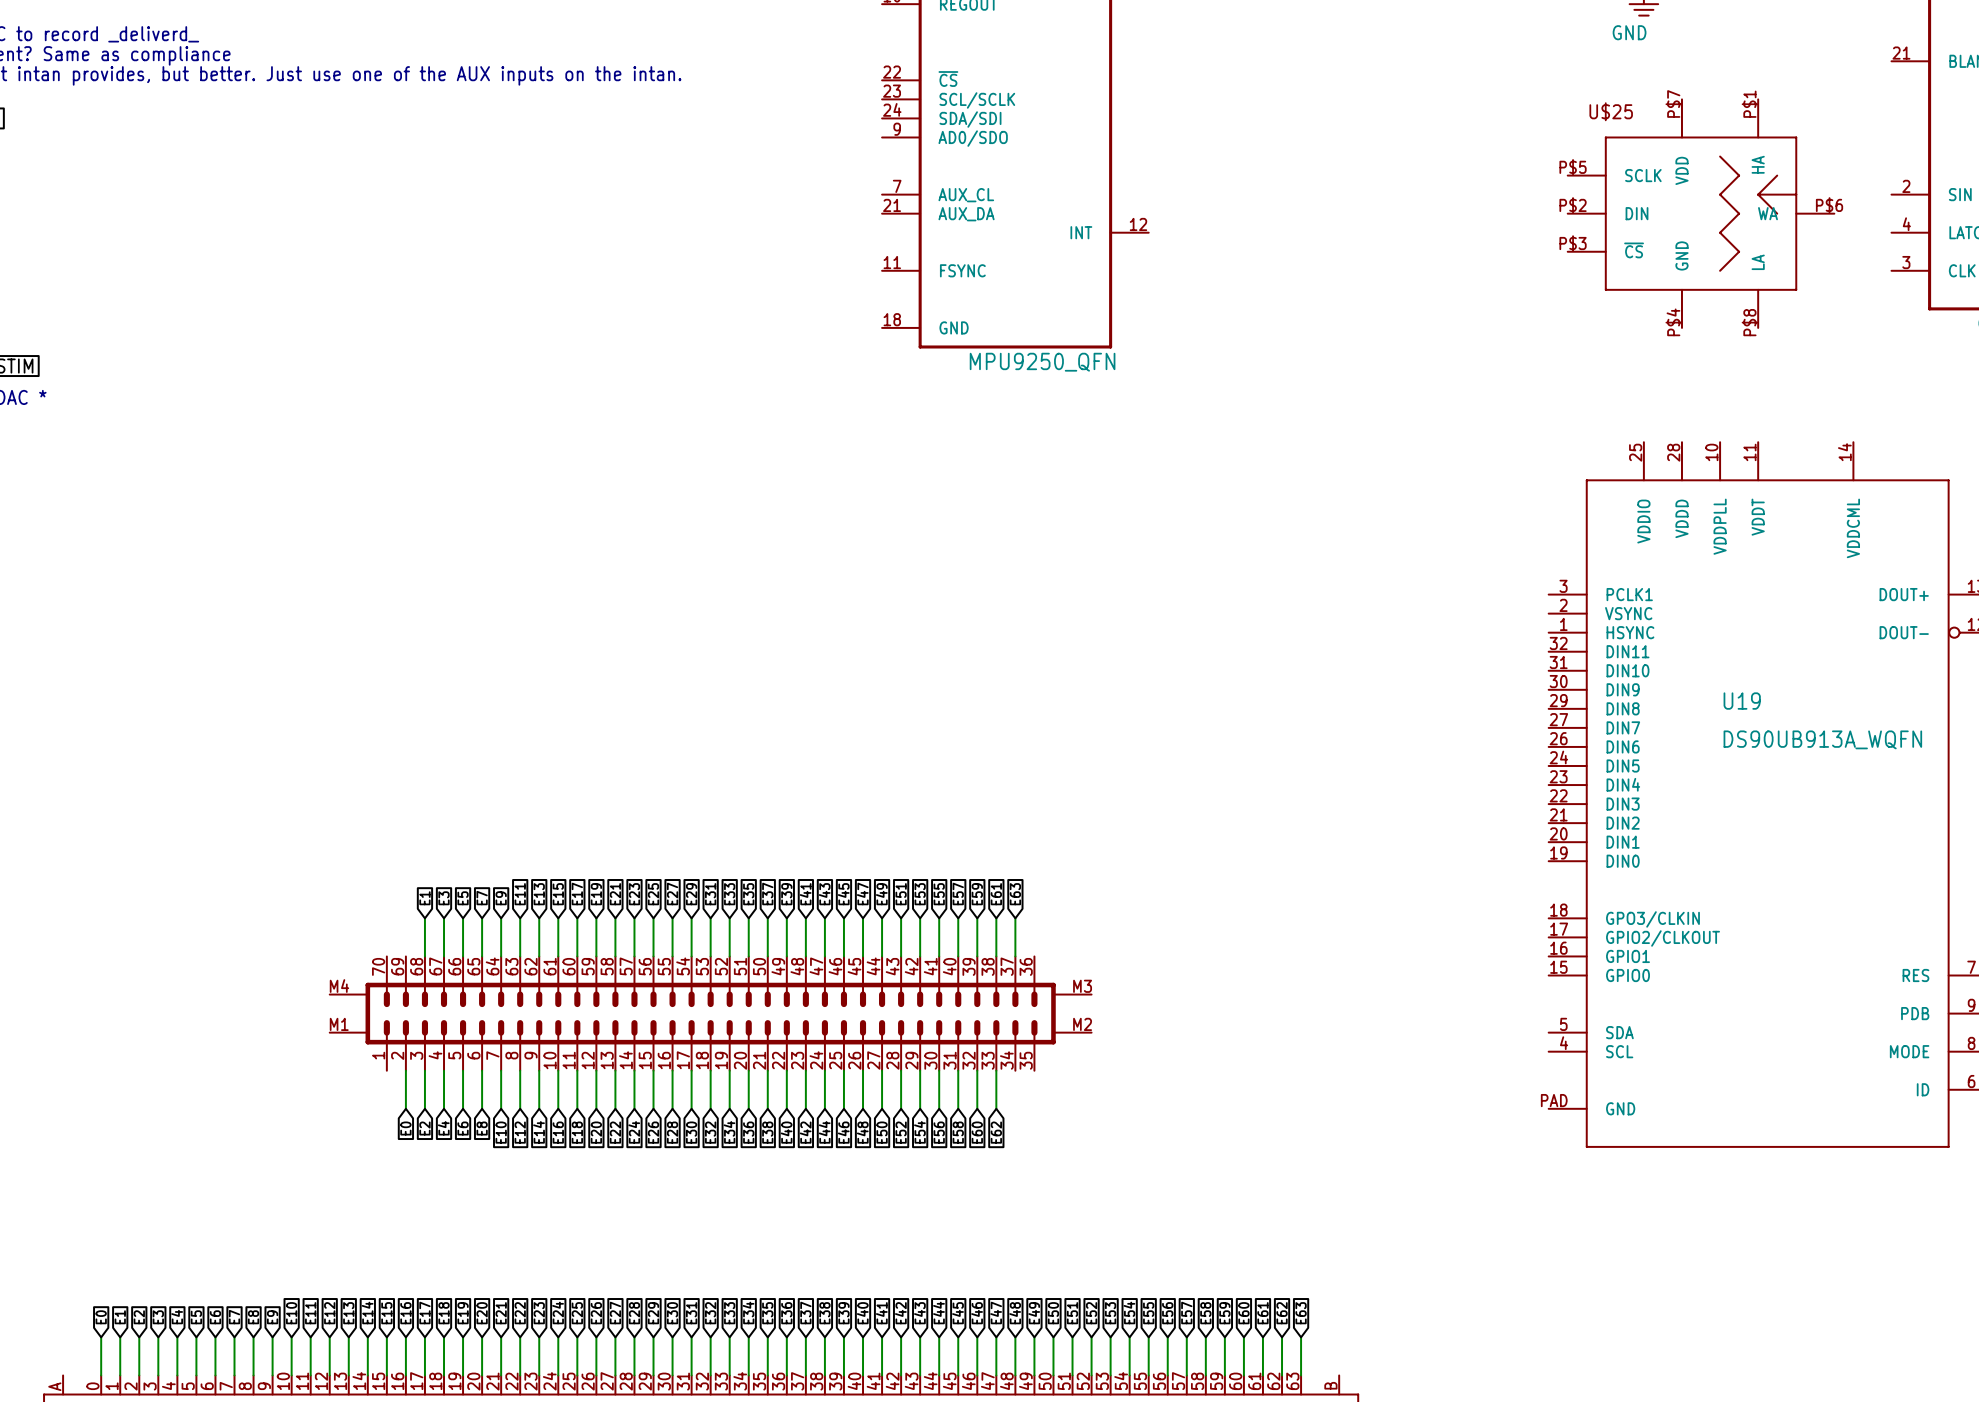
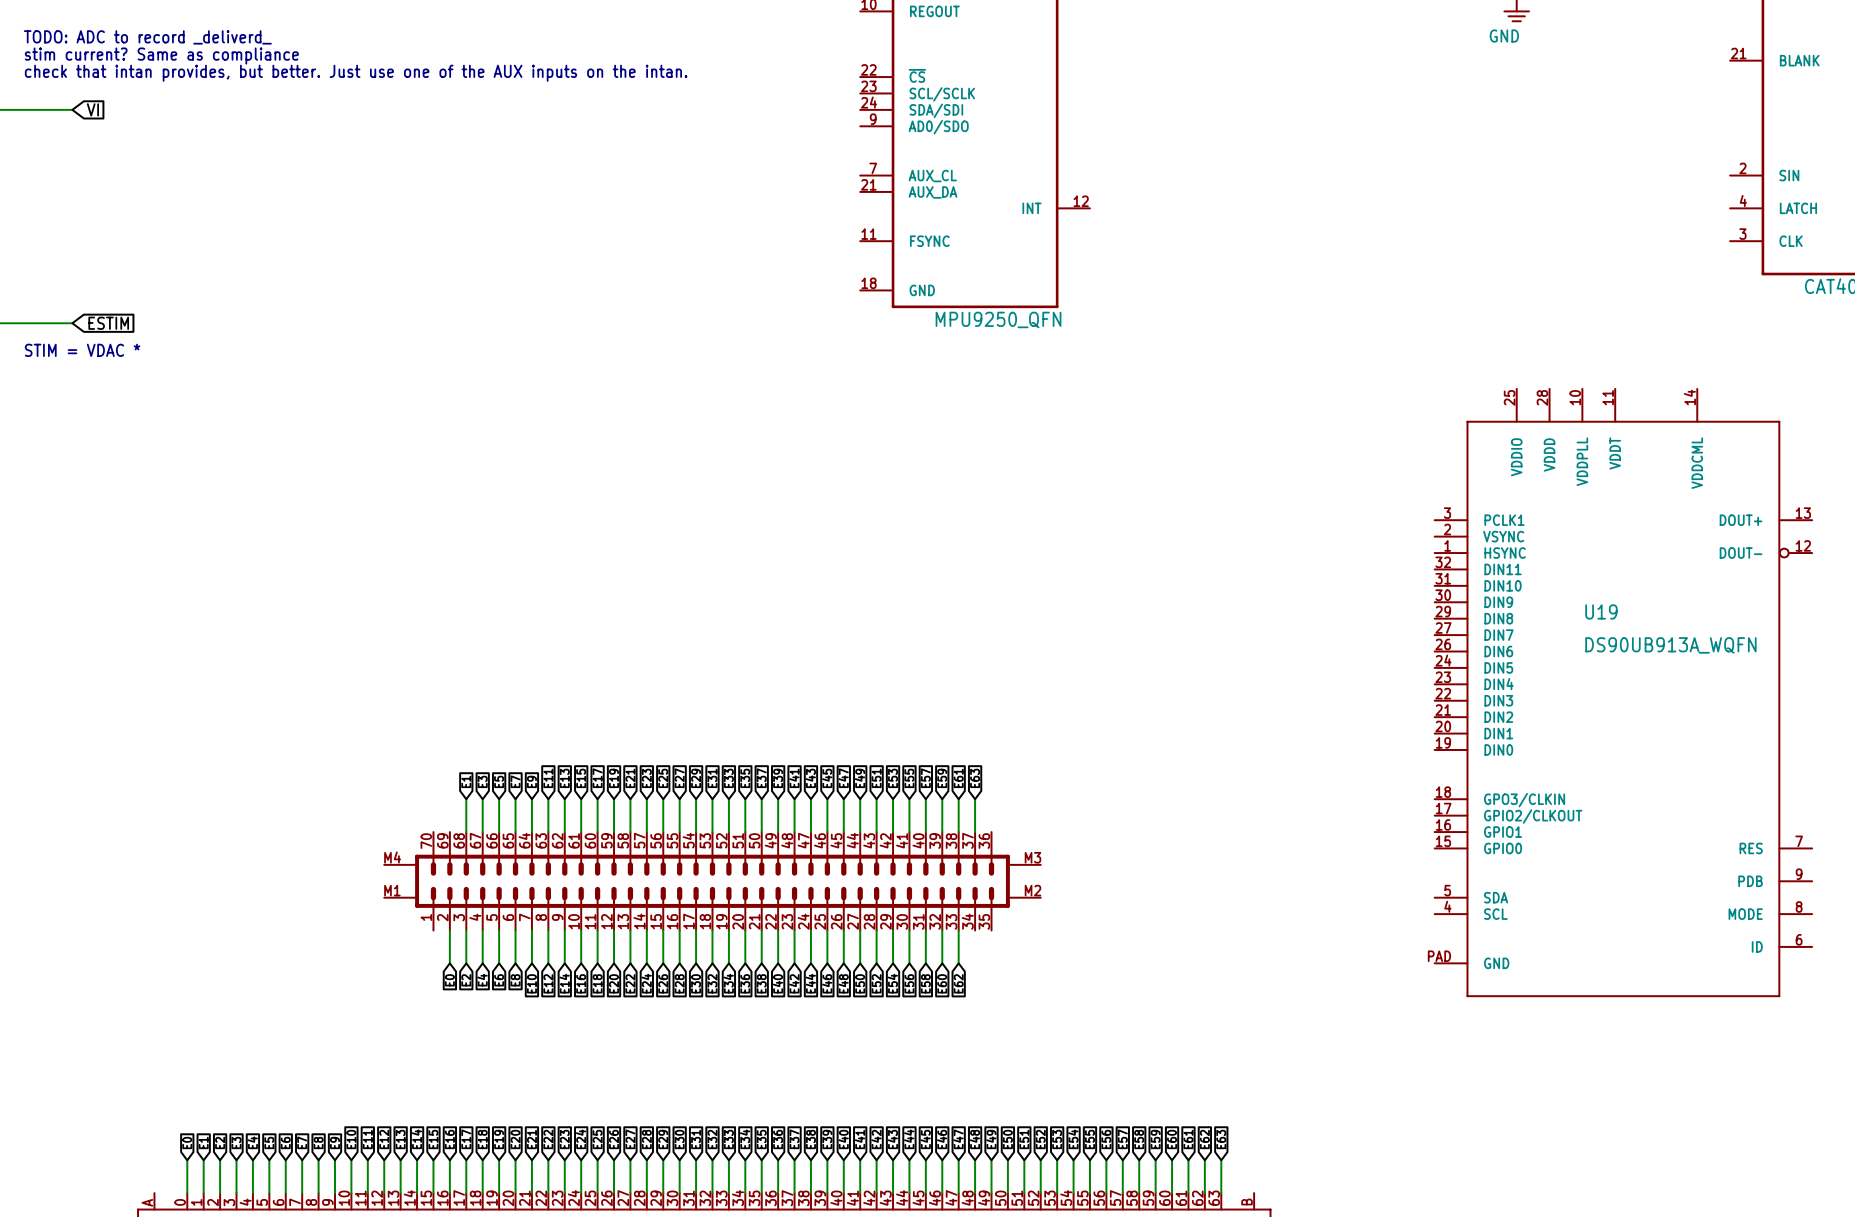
U$25: (1701, 213) -> none

